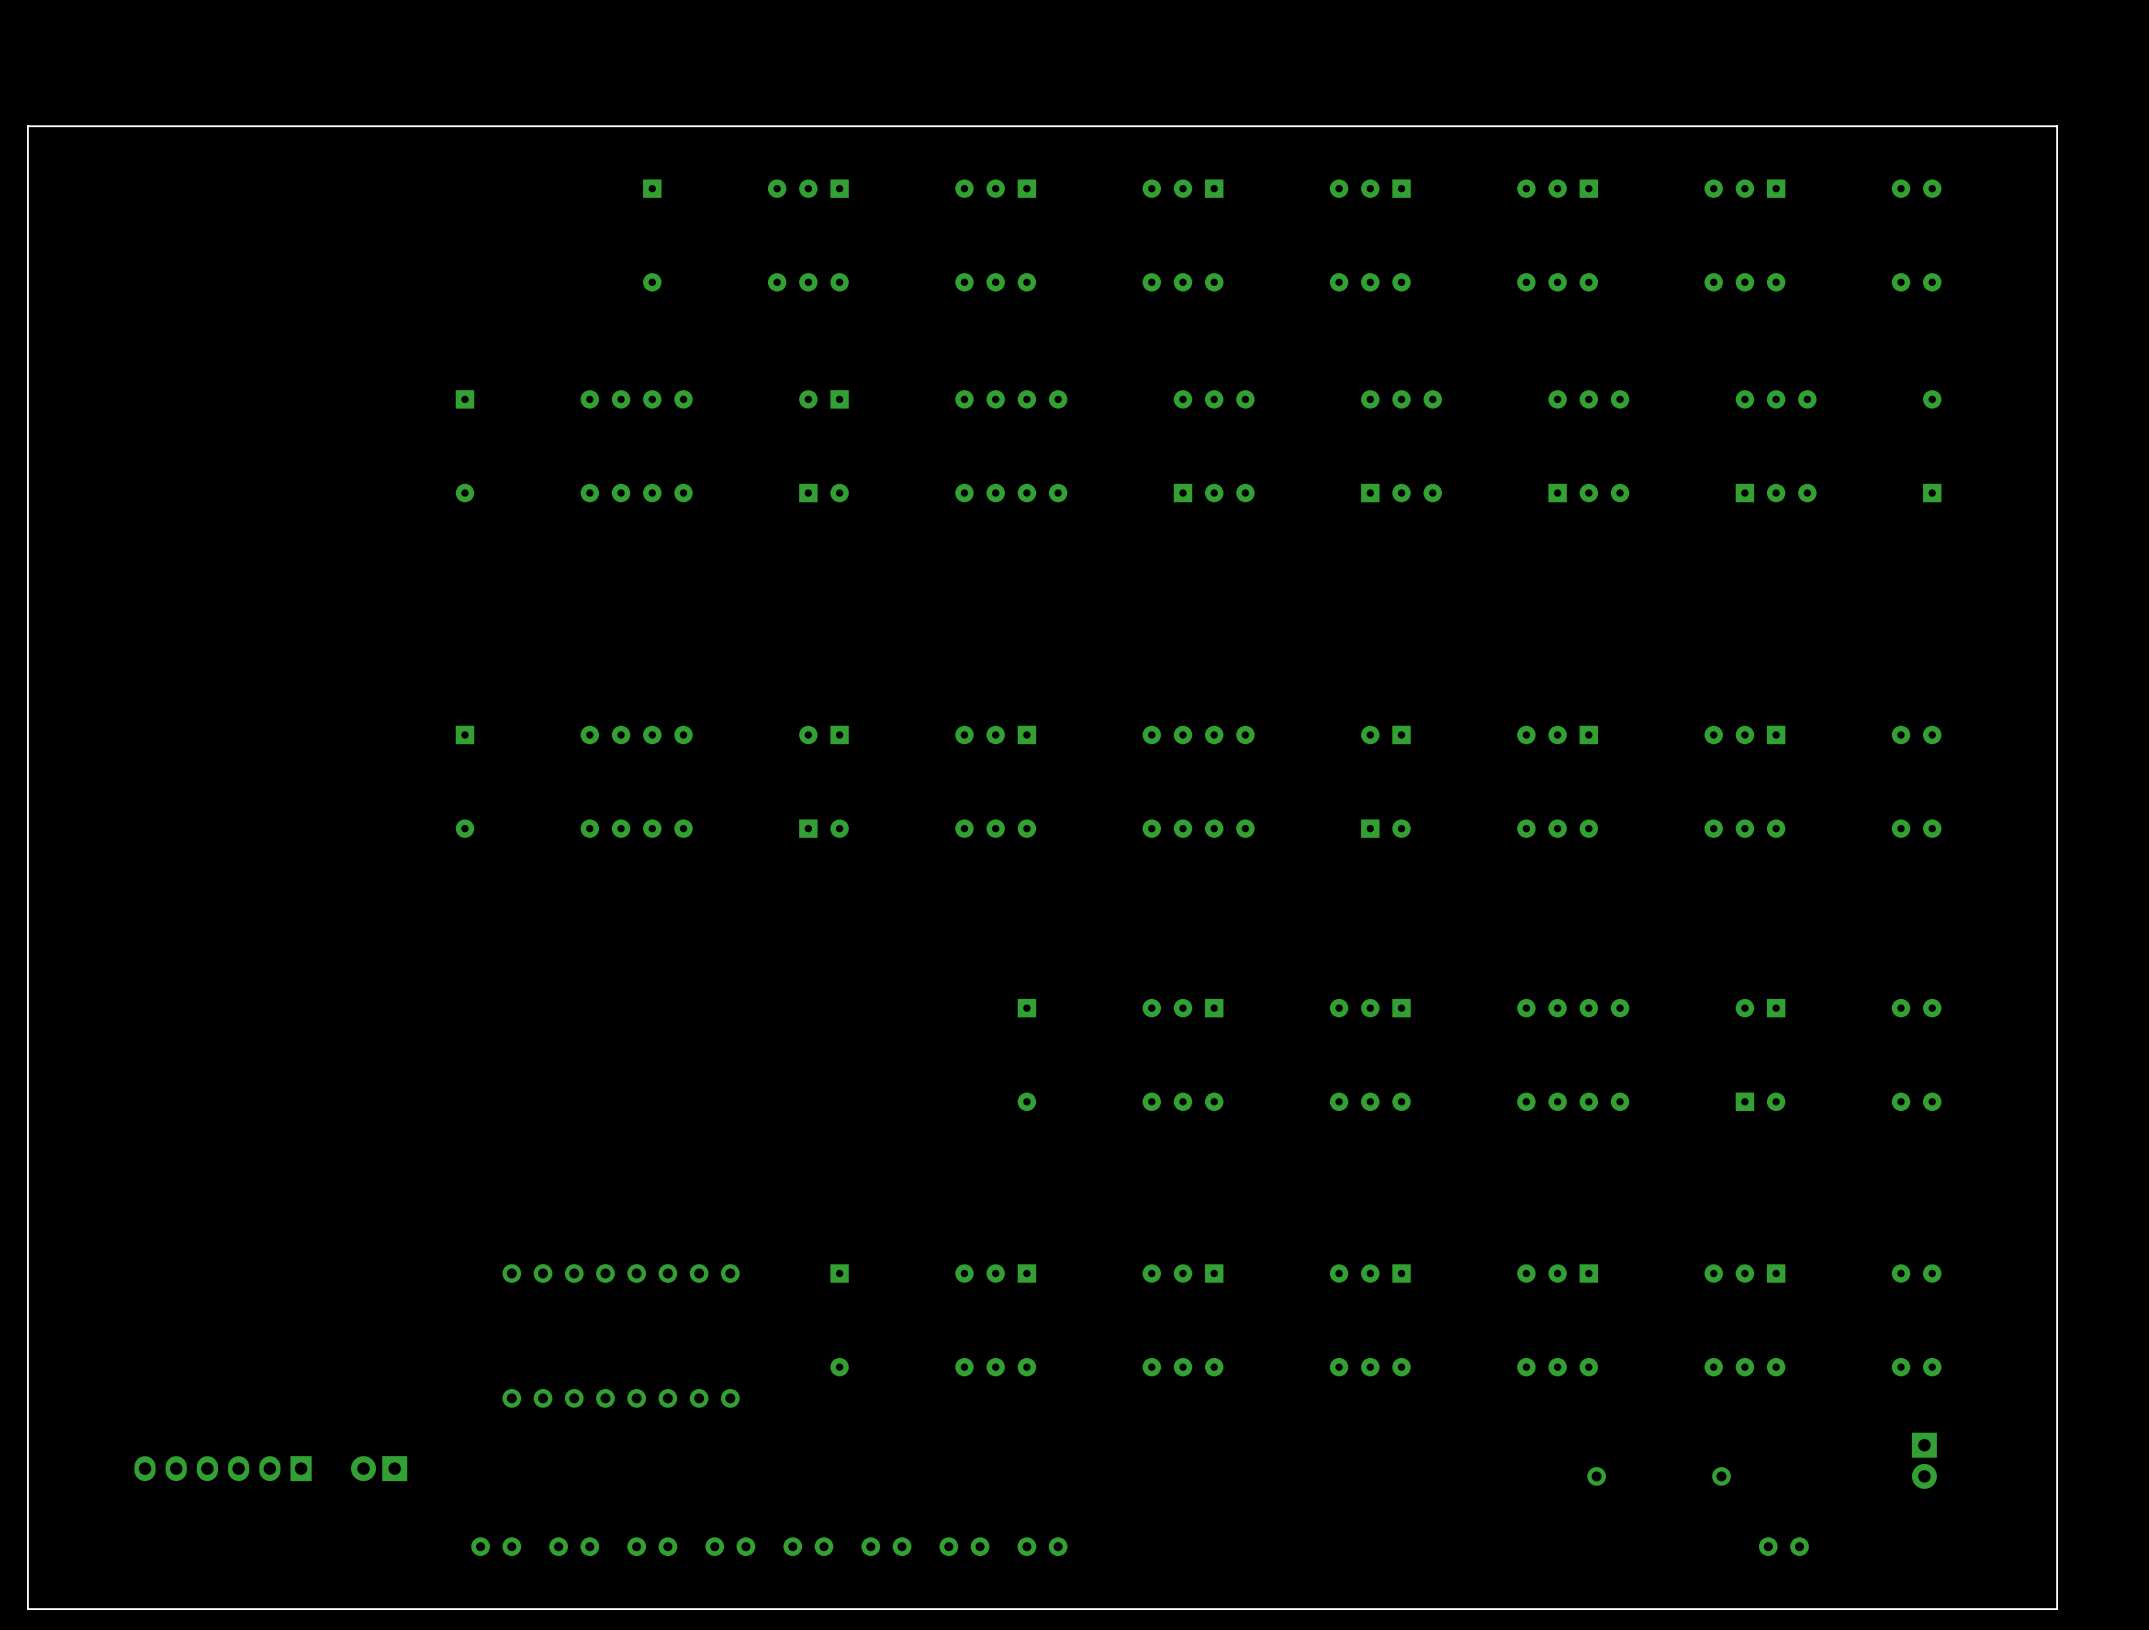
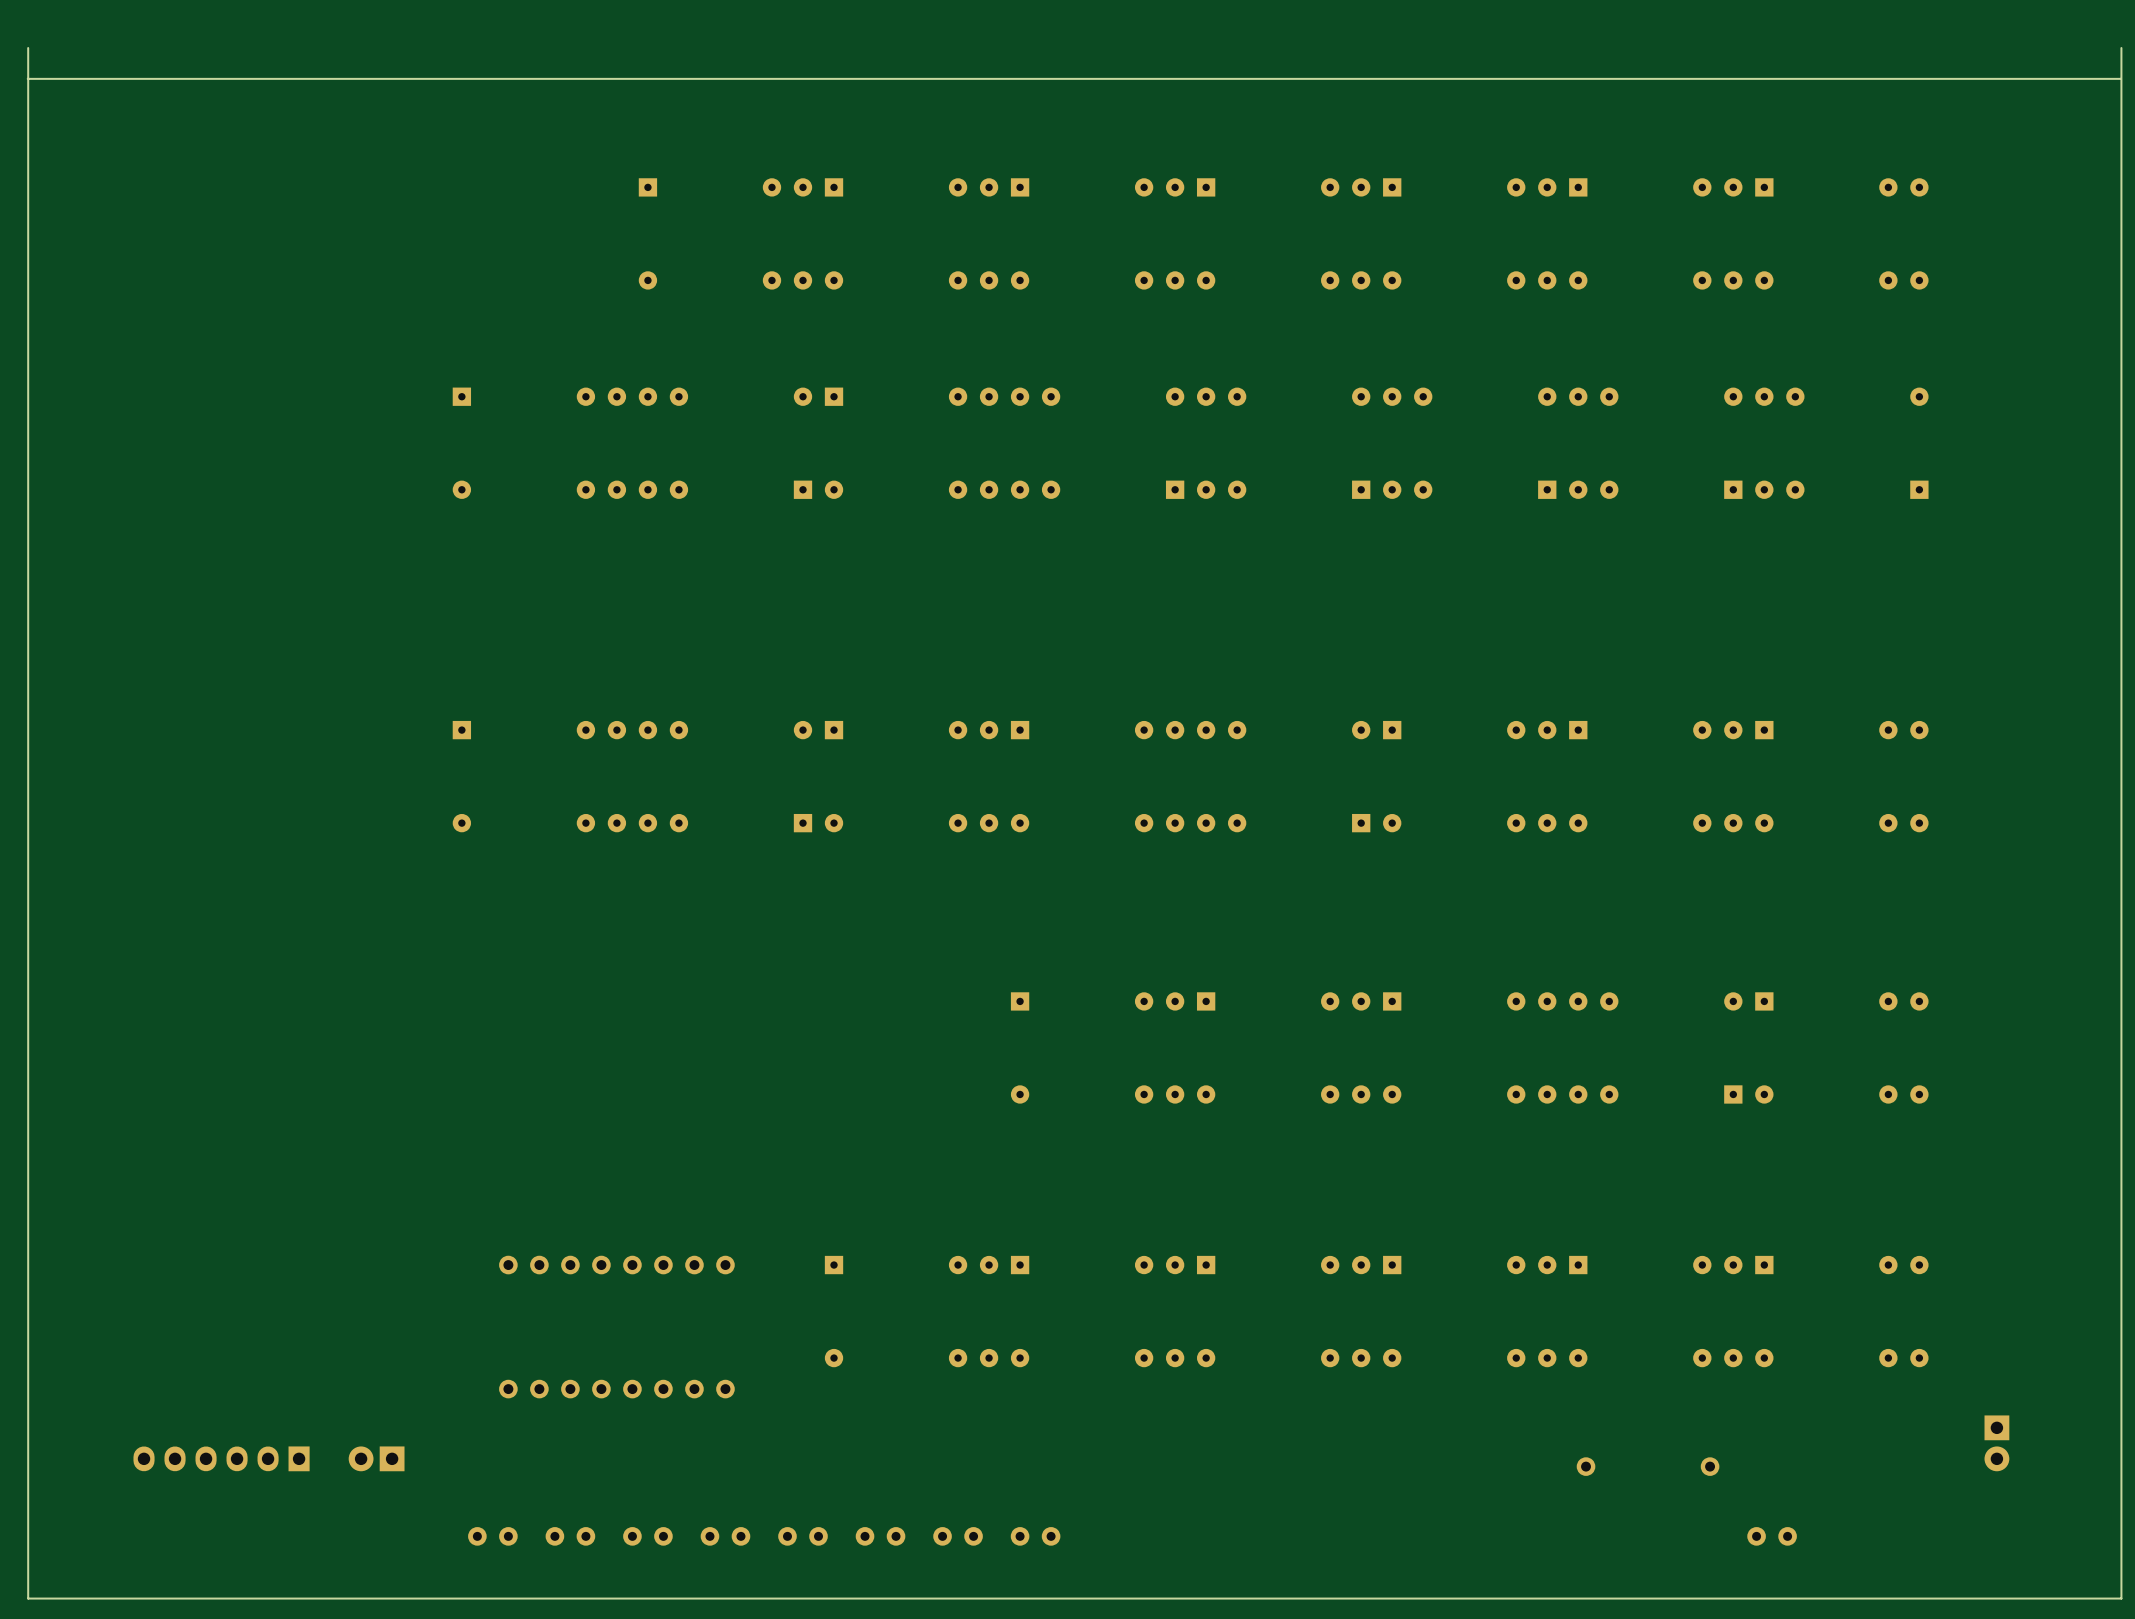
board edge: none -> (2121, 48) (2121, 1598) (28, 1598) (28, 48)
board edge: none -> (2120, 78) (27, 78)
board edge: (2057, 126) (2057, 1609) (27, 1609) (27, 126) (2057, 126) -> none
part position: (1924, 1460) -> (1996, 1443)

